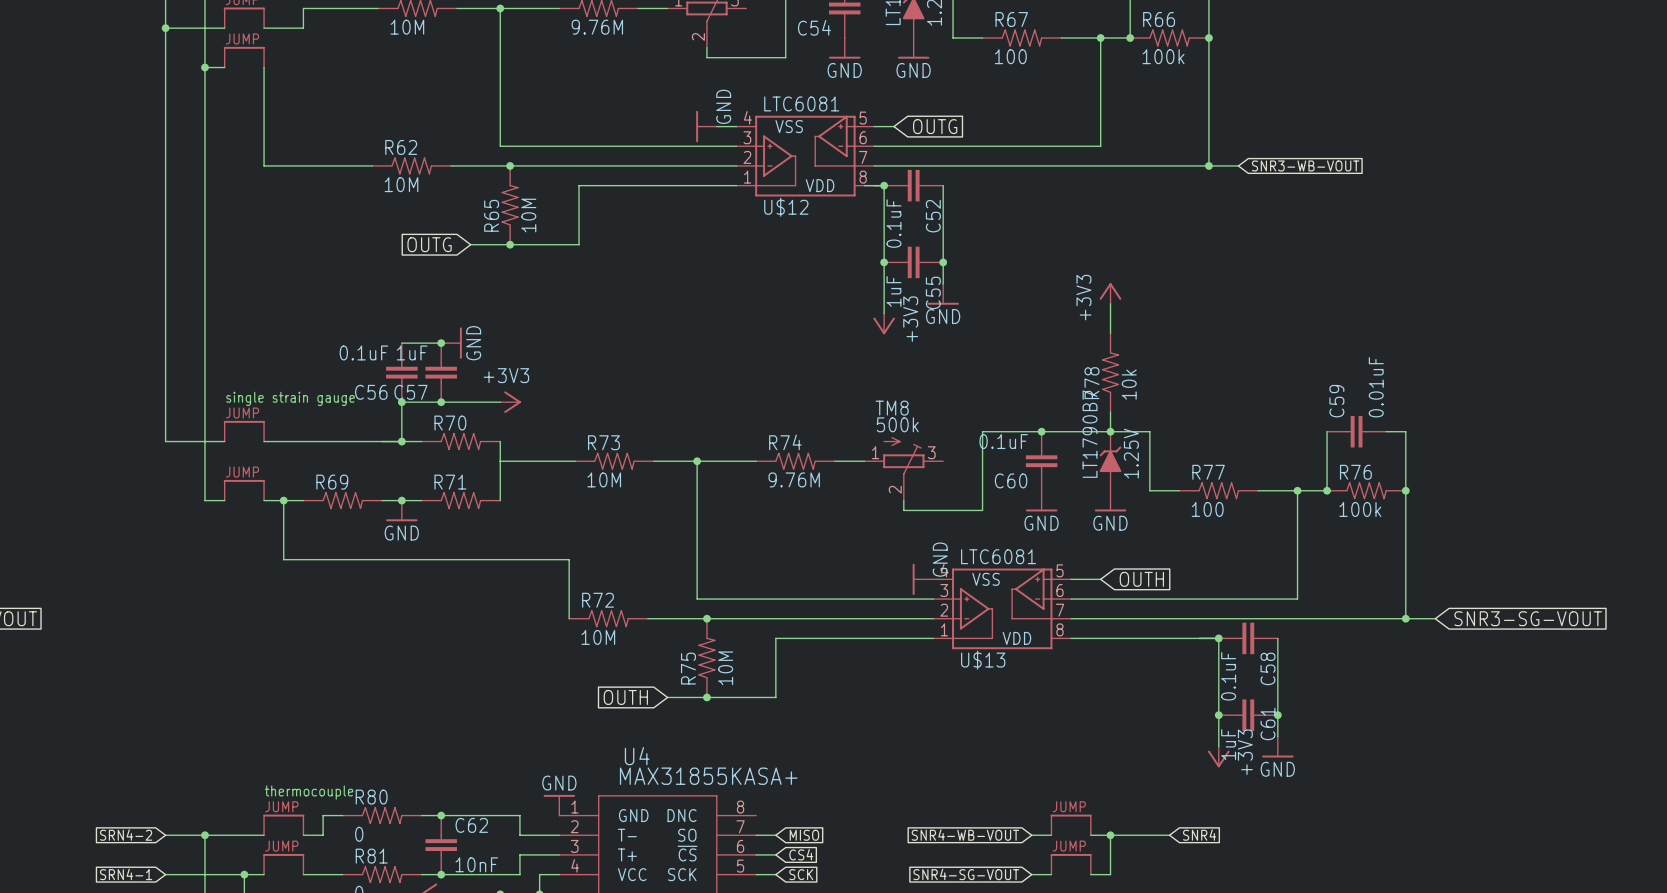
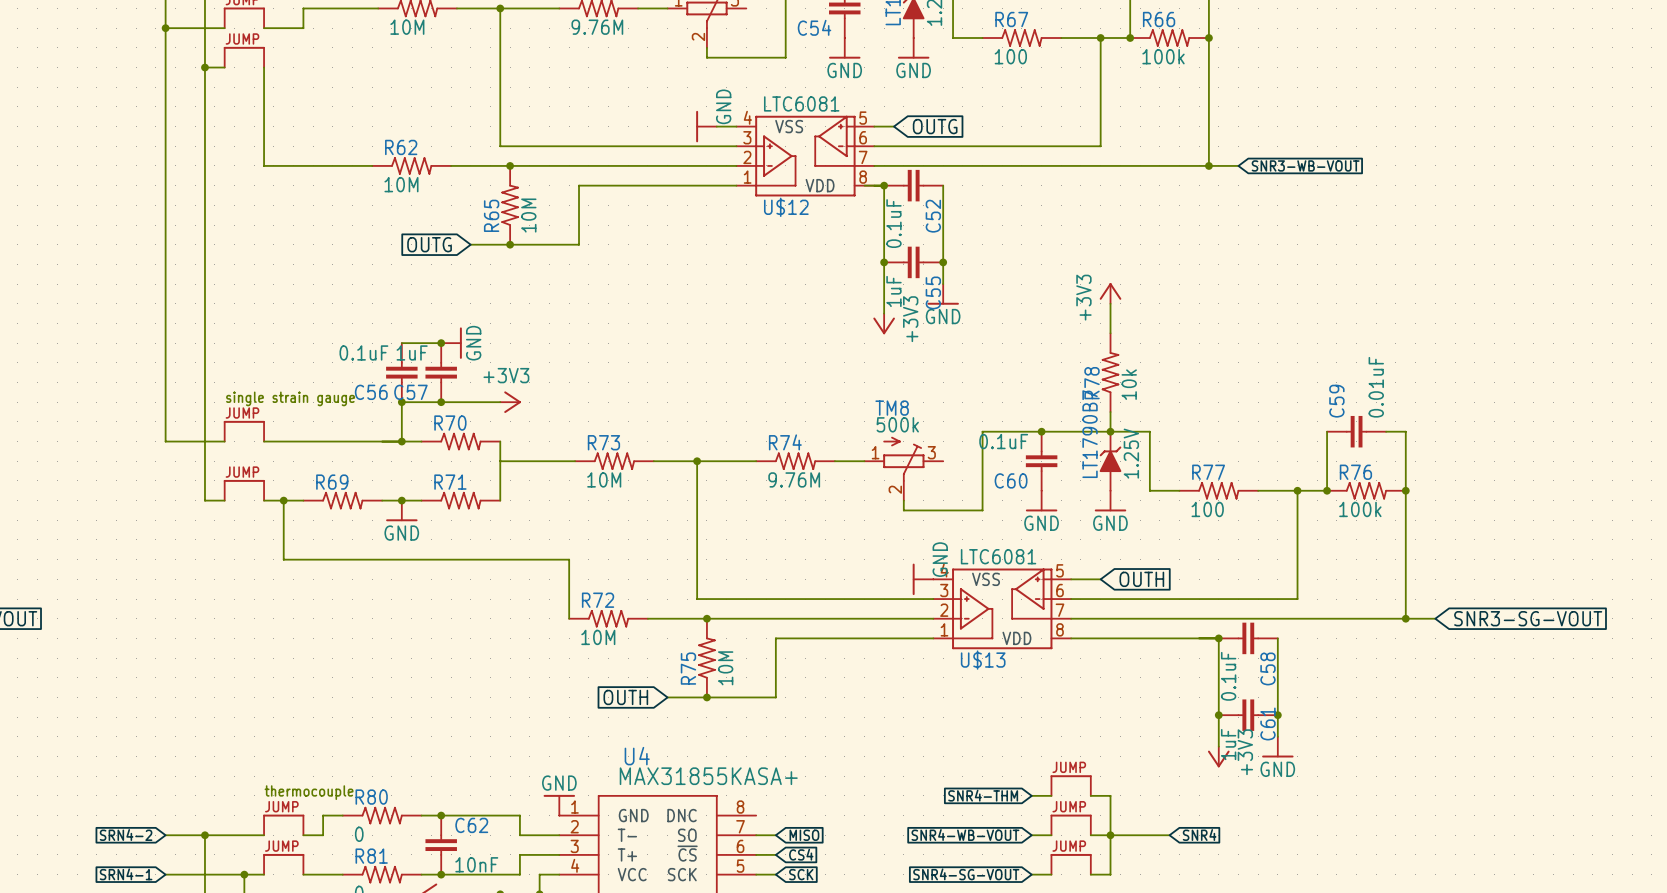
part: none -> (1071, 785)
global label: none -> SNR4-THM (983, 795)
wire: none -> (1031, 795) (1051, 795)
wire: none -> (1090, 795) (1110, 795) (1110, 835)

